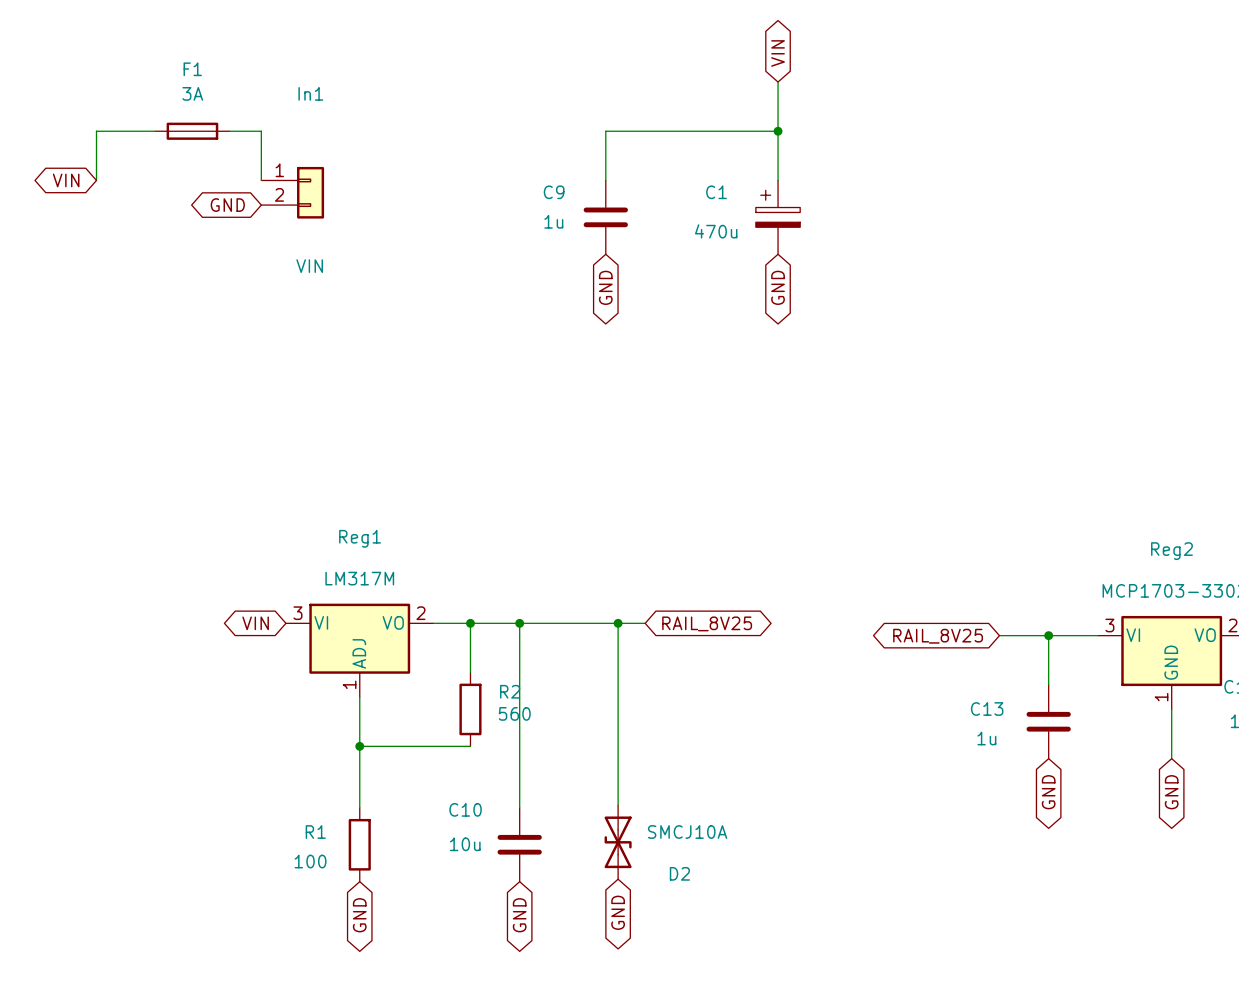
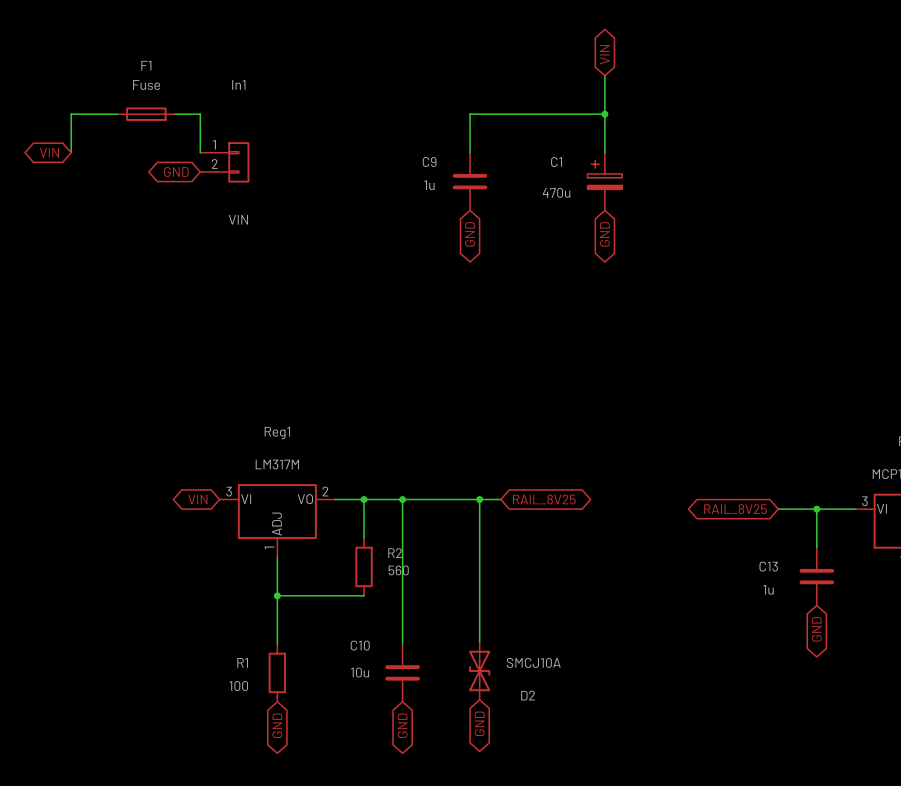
F1 value: 3A (192, 93) -> Fuse (146, 85)

